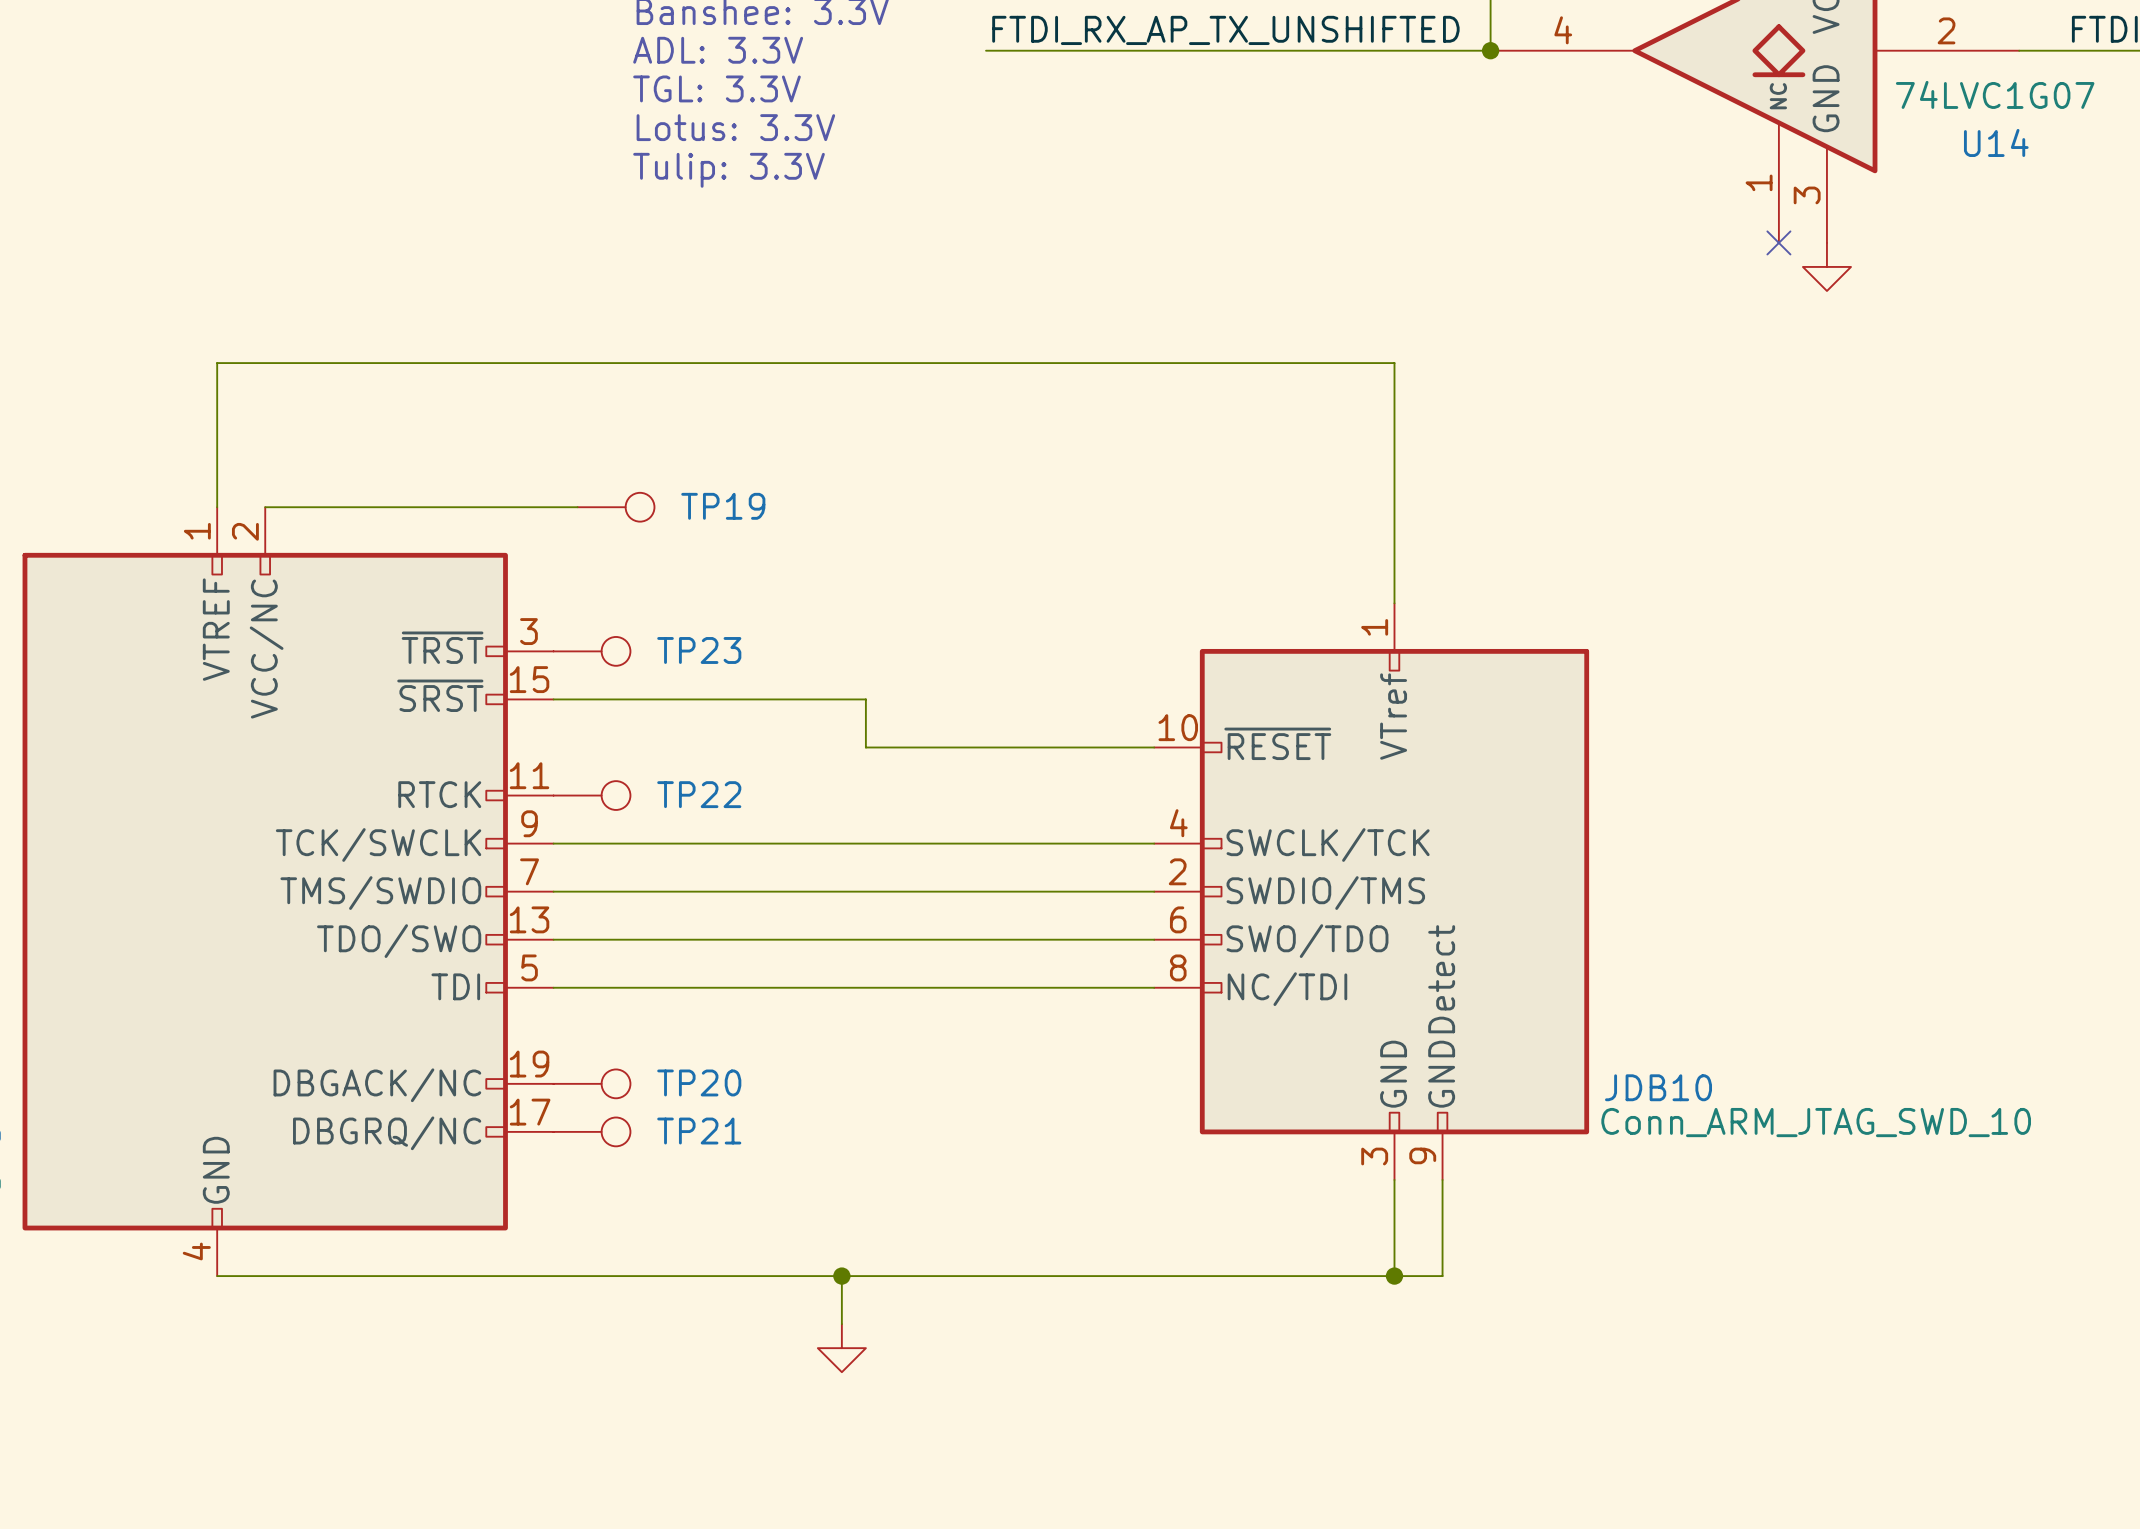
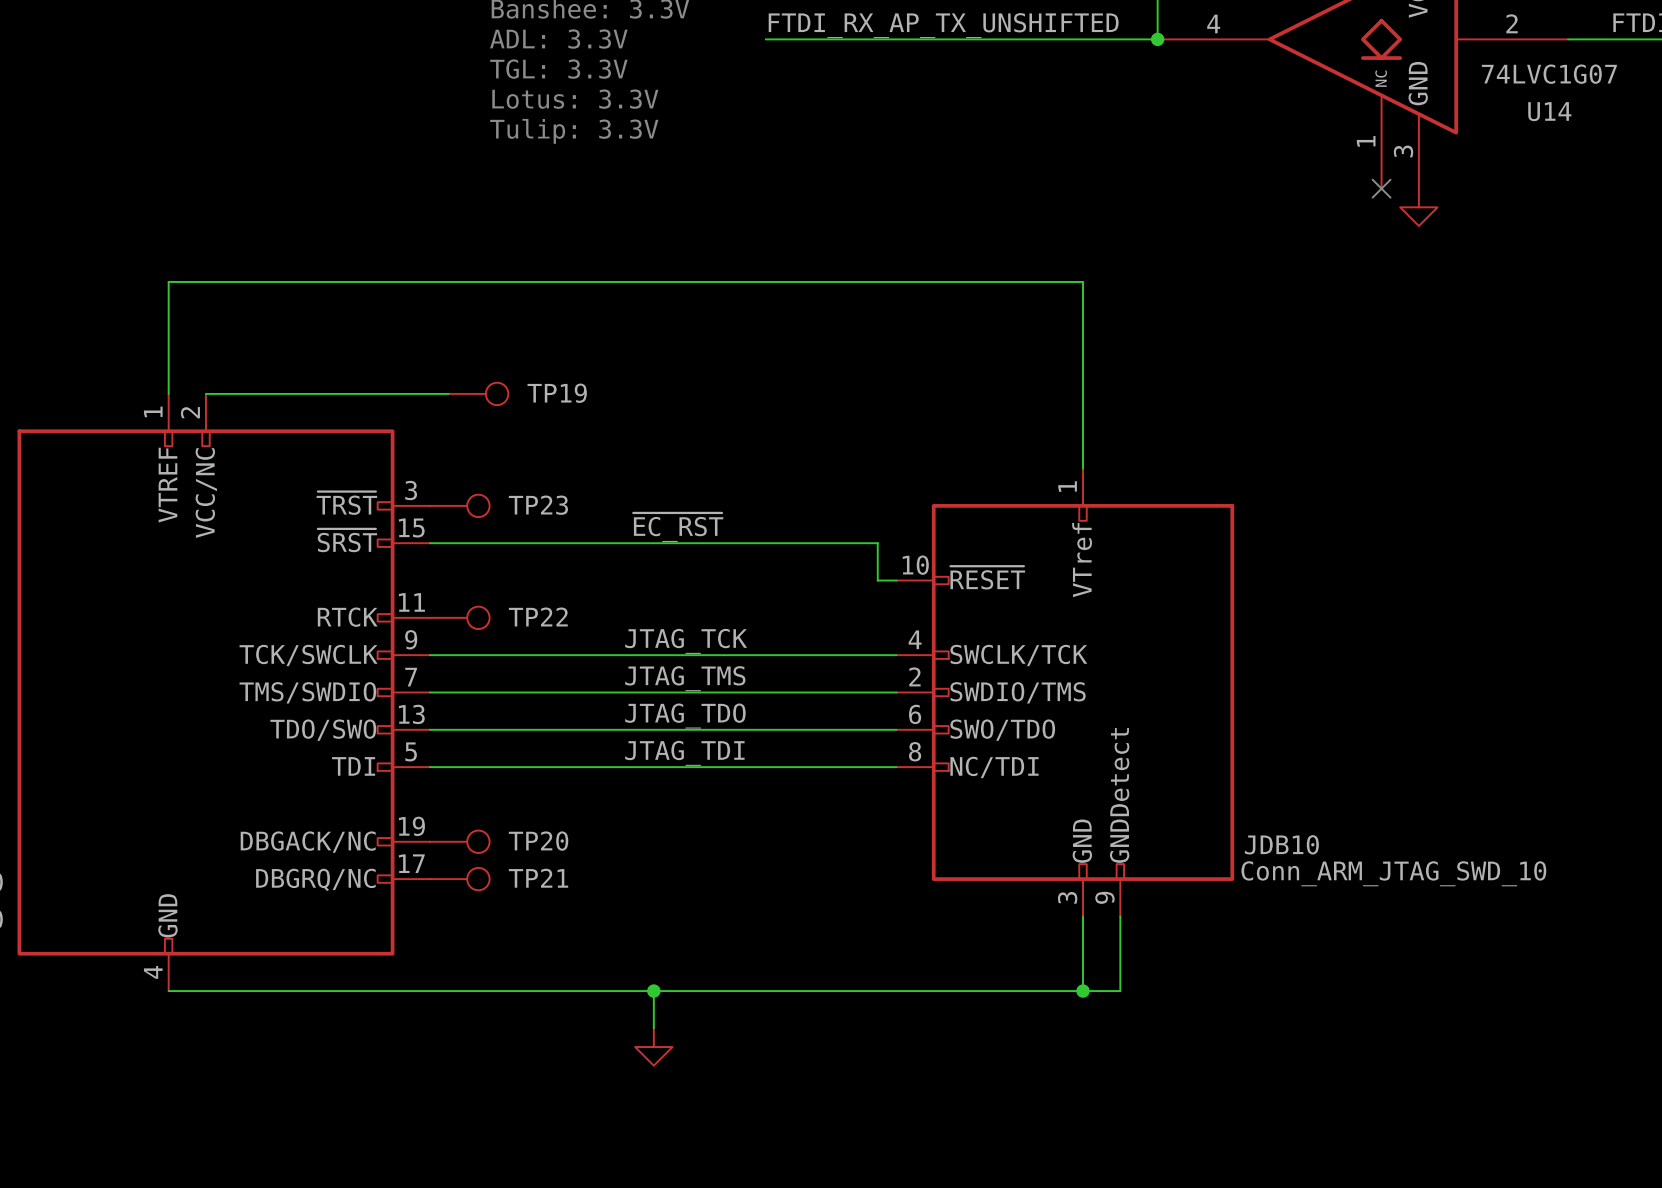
label: none -> ~{EC_RST} (678, 527)
wire: (865, 699) (865, 747) (1130, 747) -> (672, 543) (877, 543) (877, 580)
label: none -> JTAG_TCK (686, 641)
label: none -> JTAG_TMS (685, 678)
label: none -> JTAG_TDO (685, 716)
label: none -> JTAG_TDI (684, 753)

